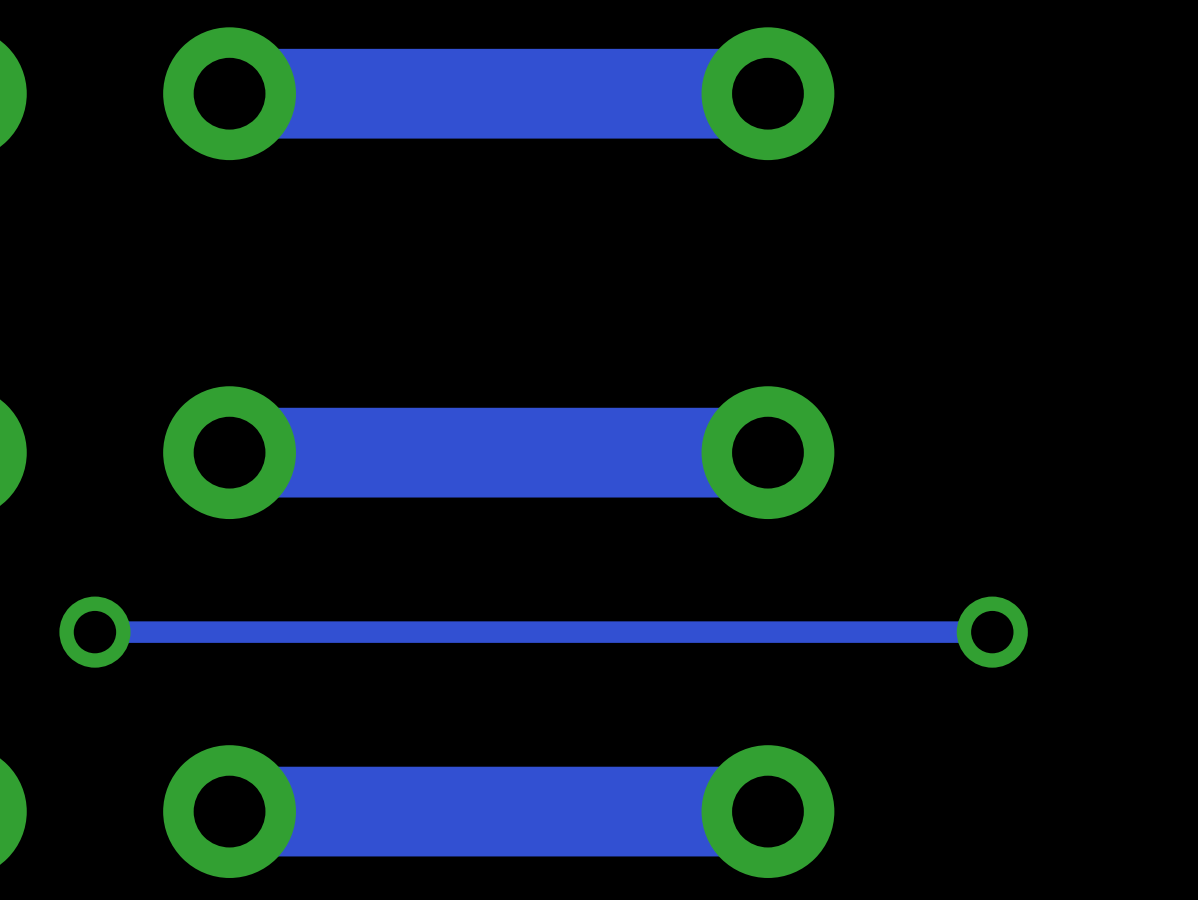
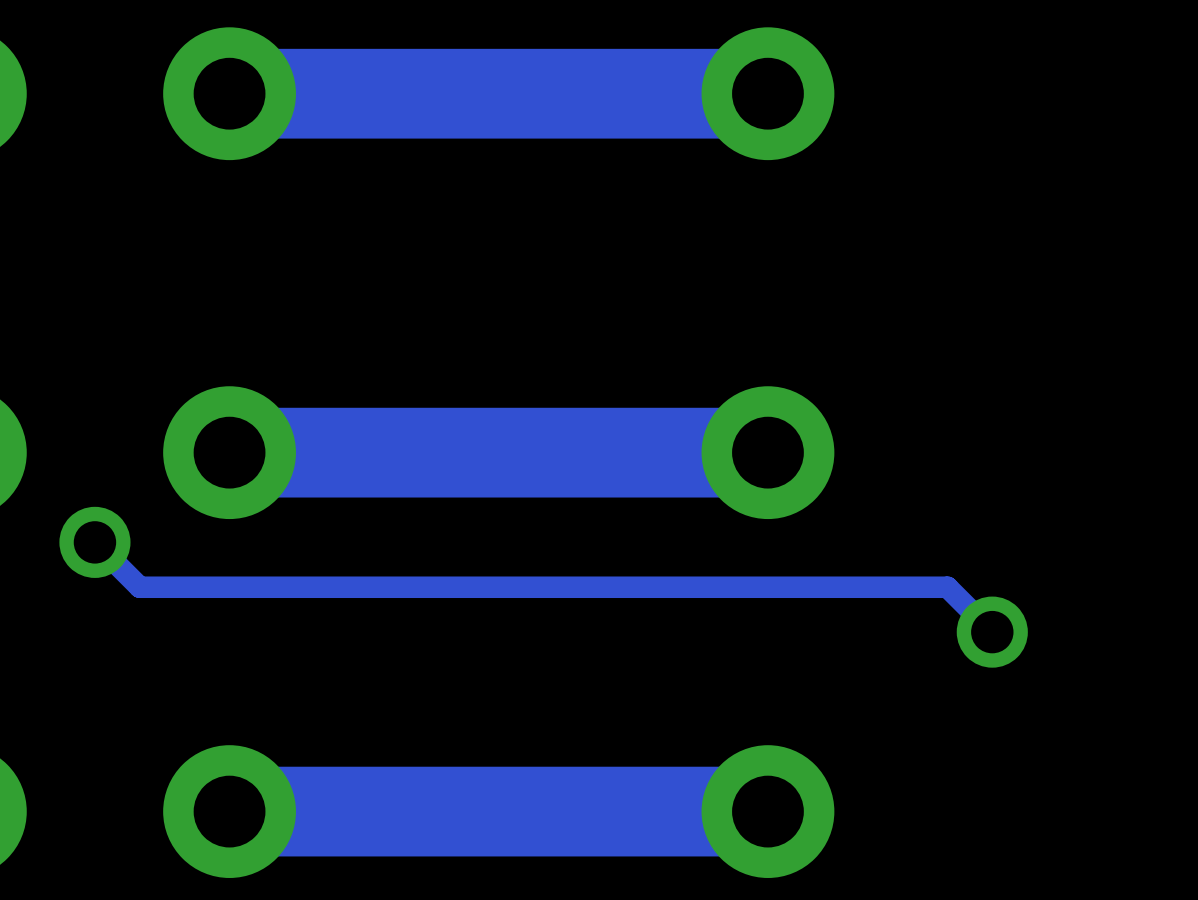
via position: (94, 632) -> (94, 542)
track: (992, 632) (94, 632) -> (992, 632) (947, 587) (139, 587) (94, 542)

